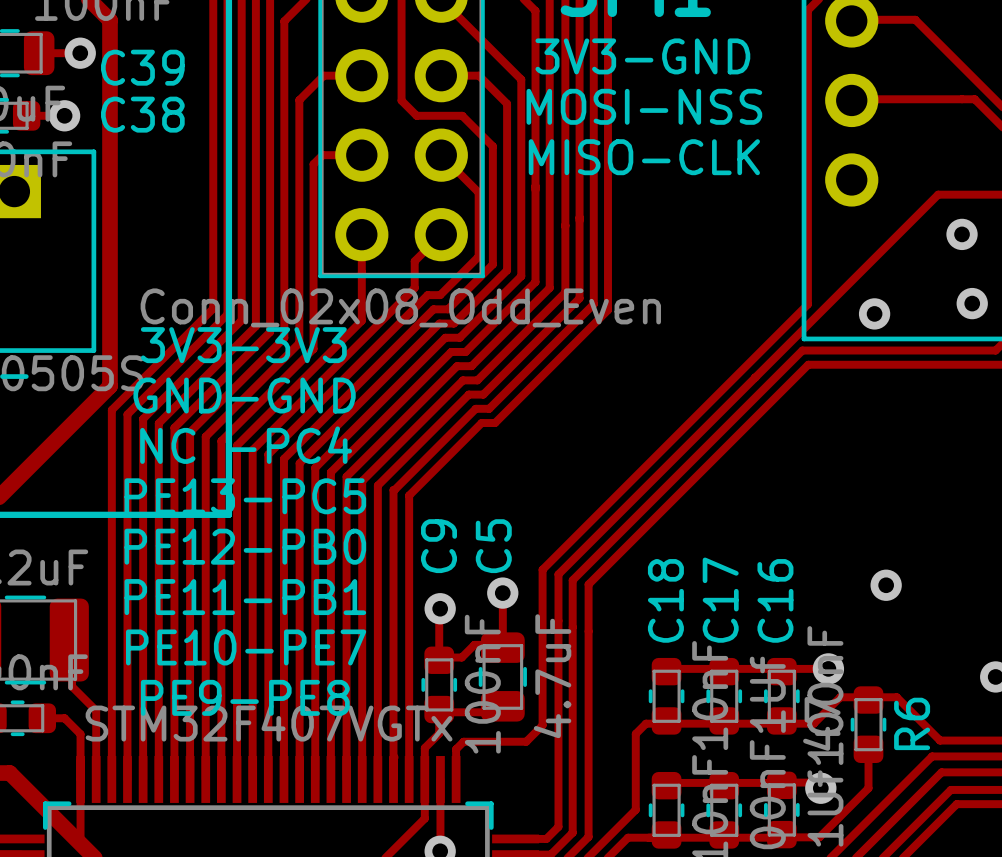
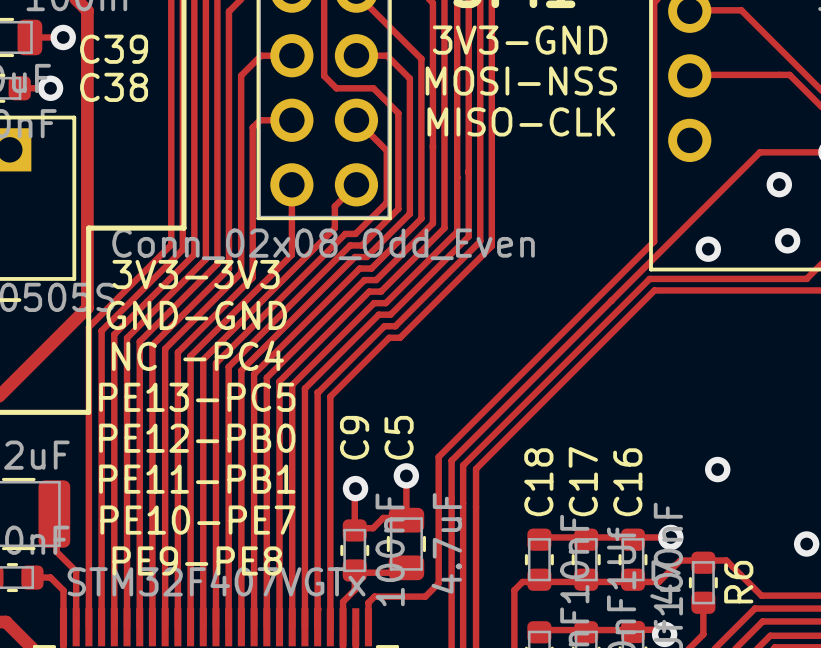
line: (228, 287) (228, 514) (111, 514) -> (183, 228) (88, 228) (88, 412)

